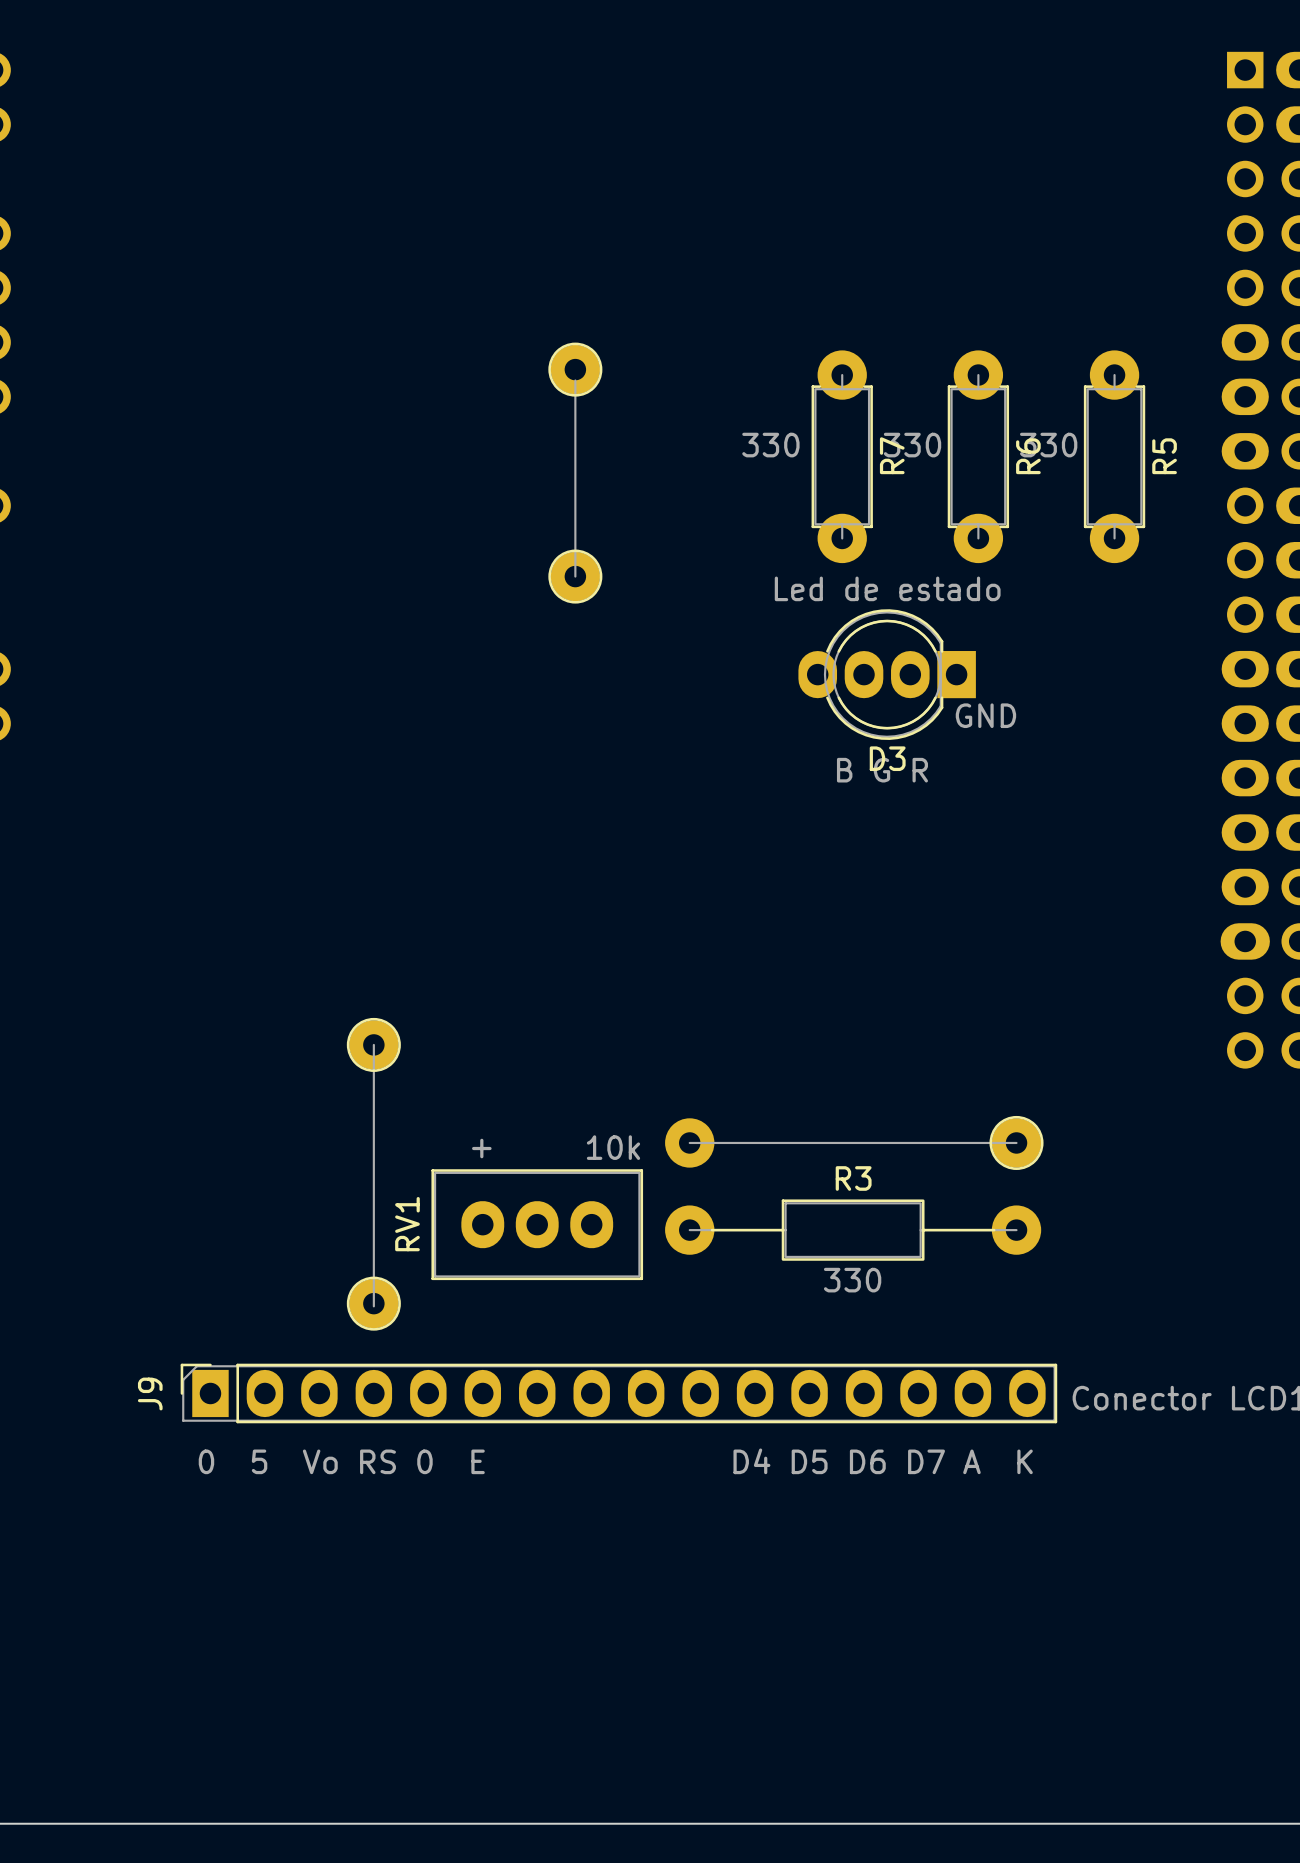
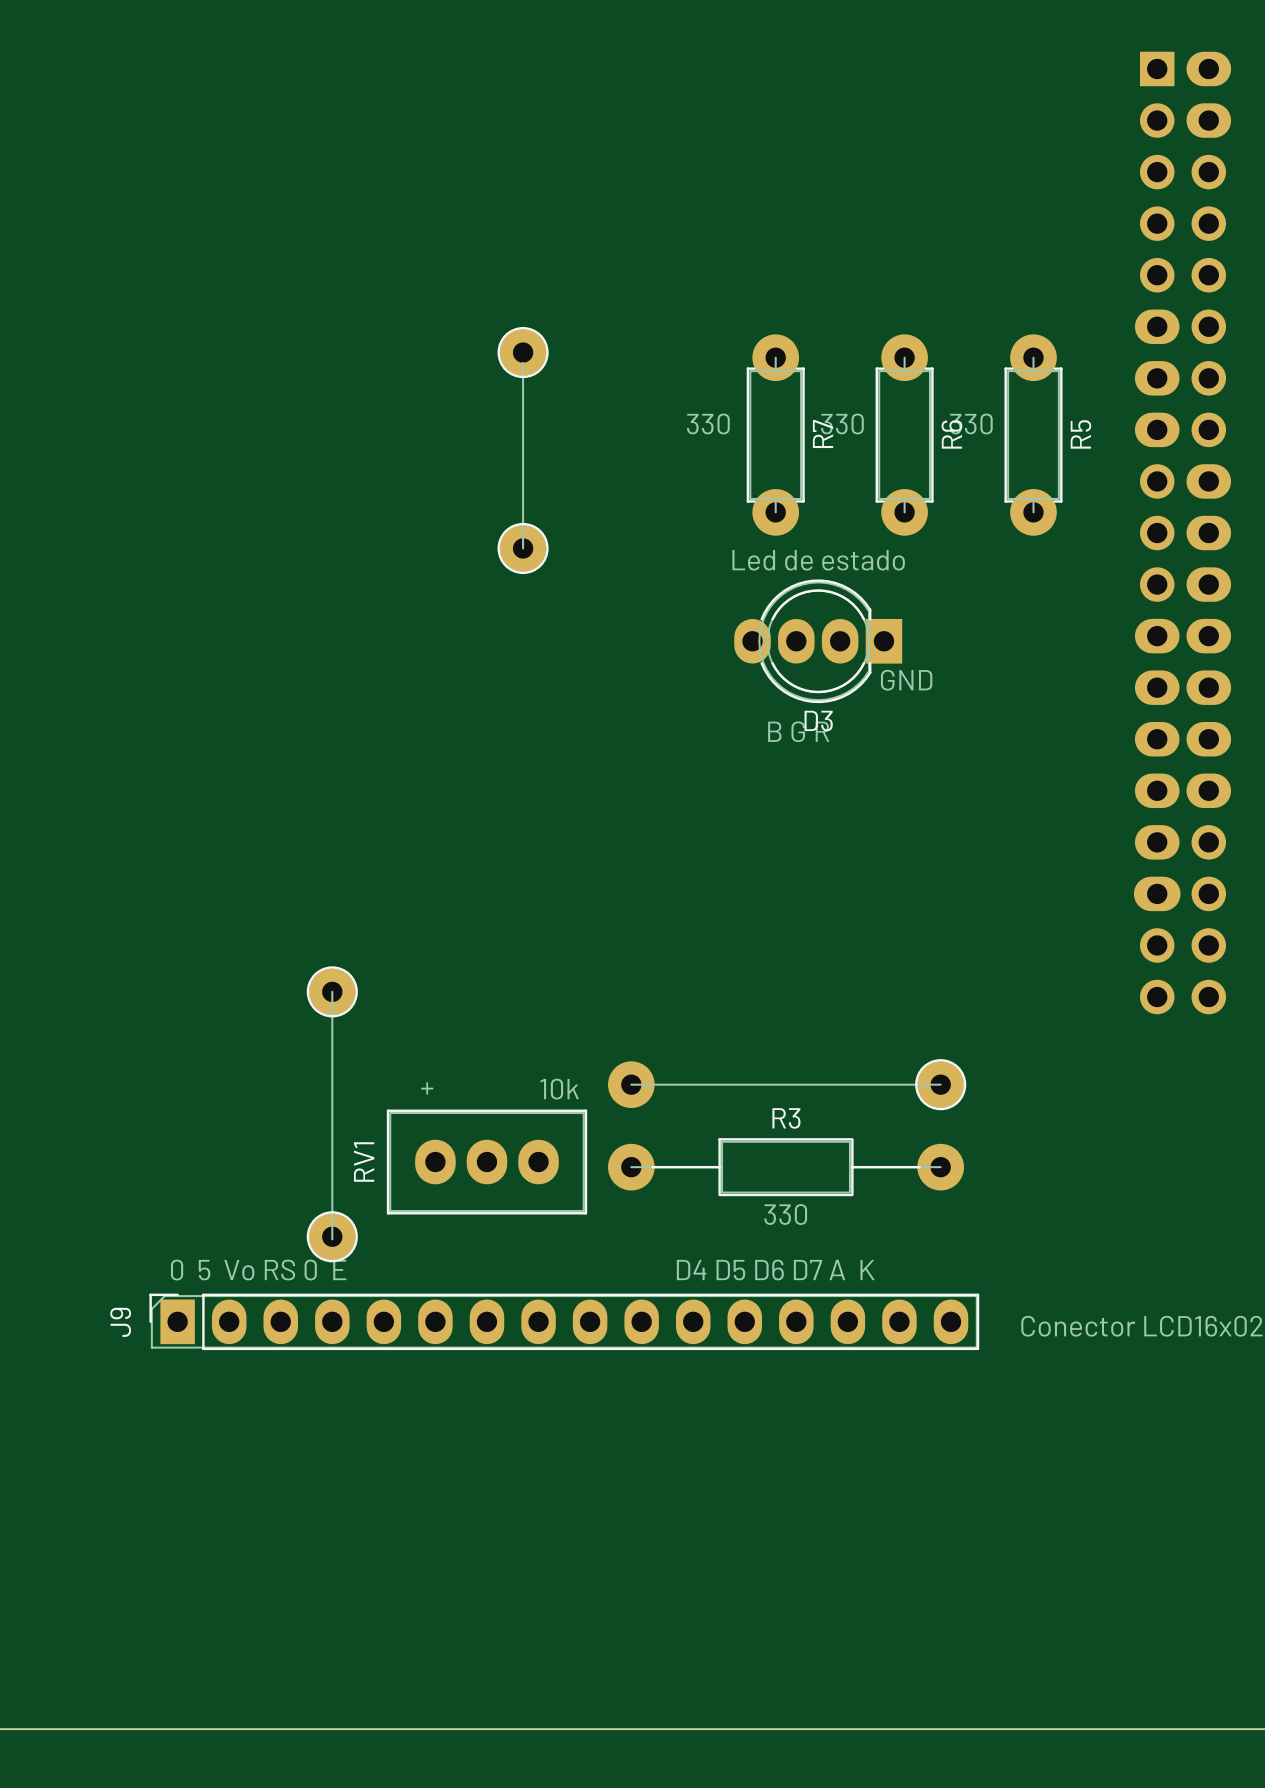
text position: 0 5 Vo RS 0 E (341, 1461) -> 0 5 Vo RS 0 E (258, 1270)
text position: D4 D5 D6 D7 A K (883, 1461) -> D4 D5 D6 D7 A K (775, 1270)

